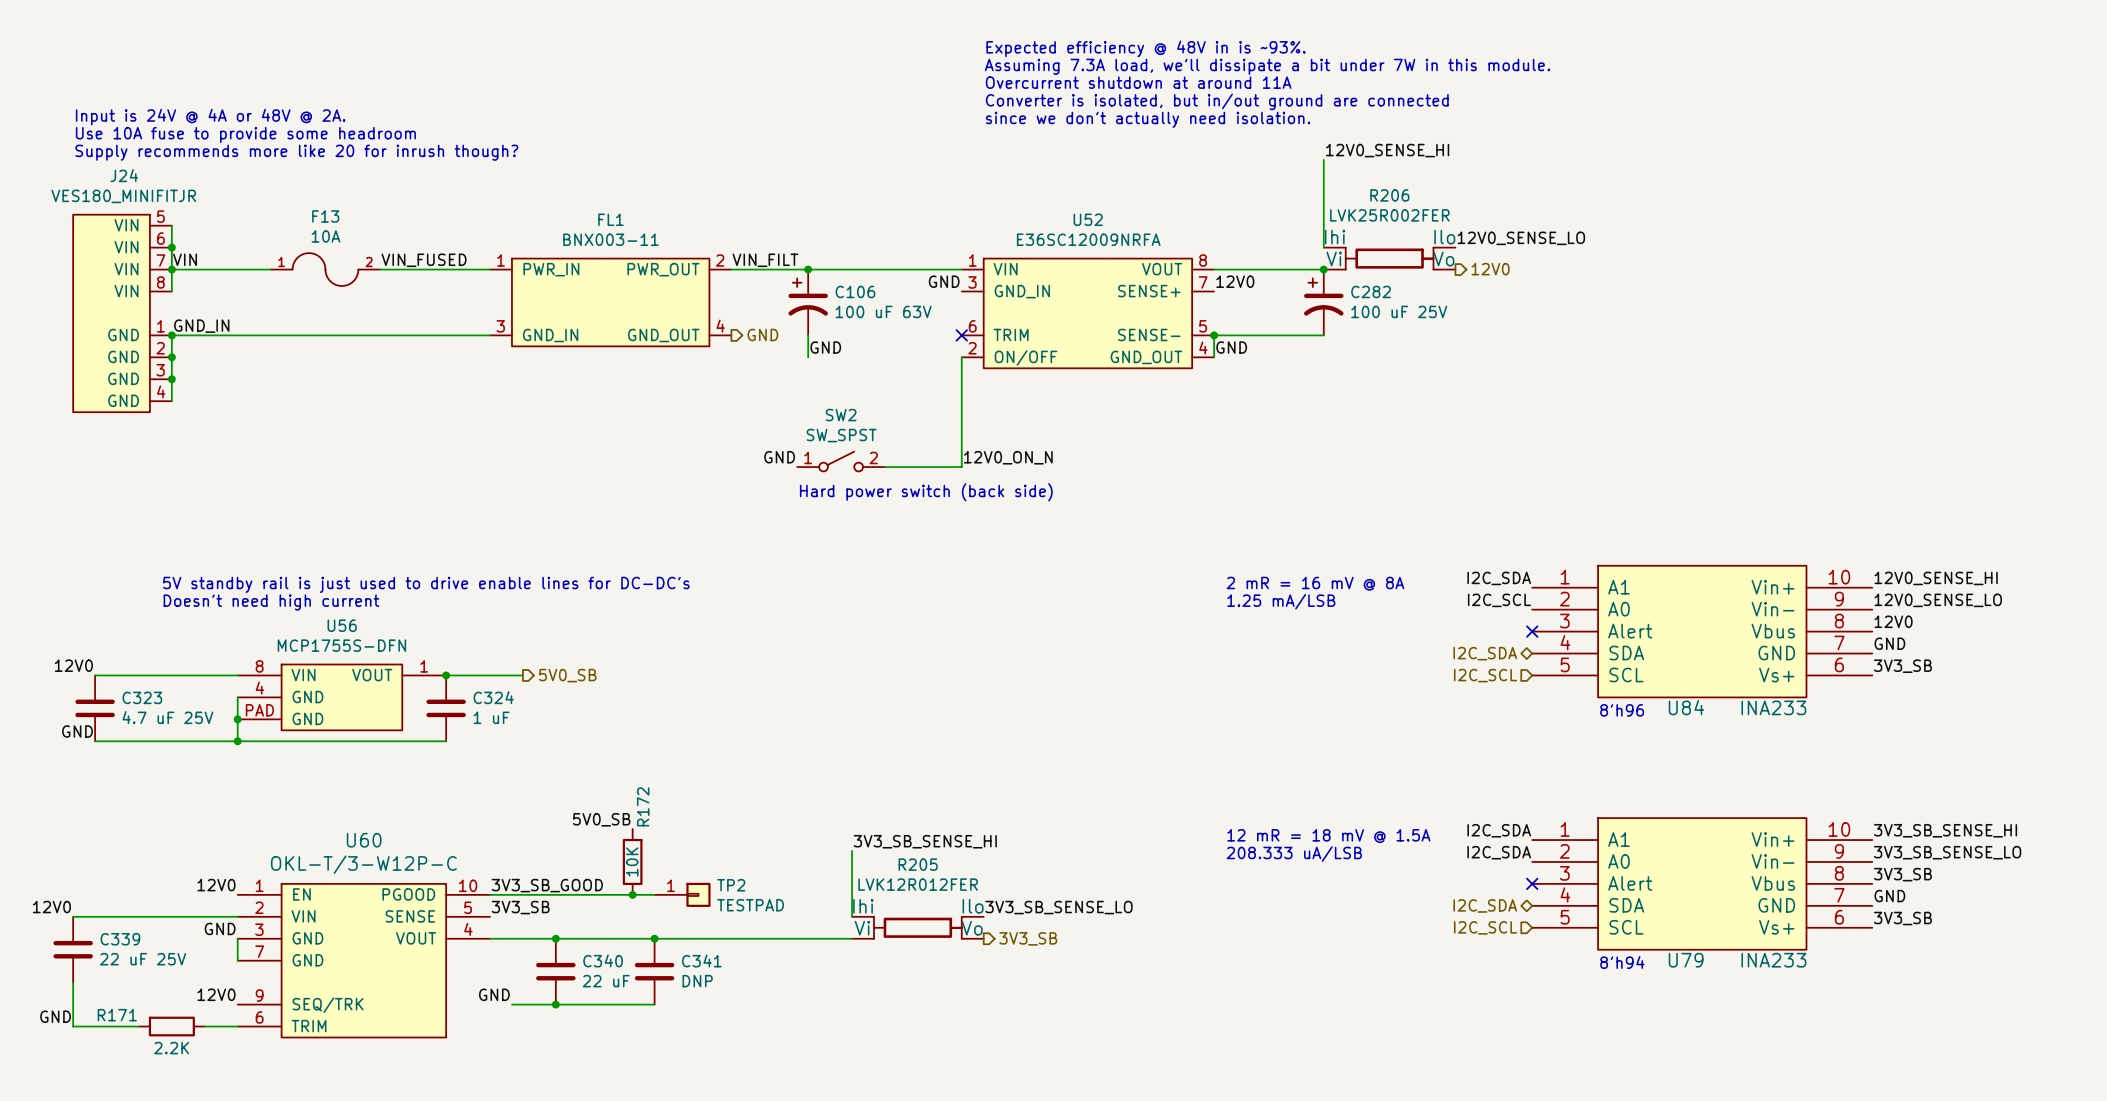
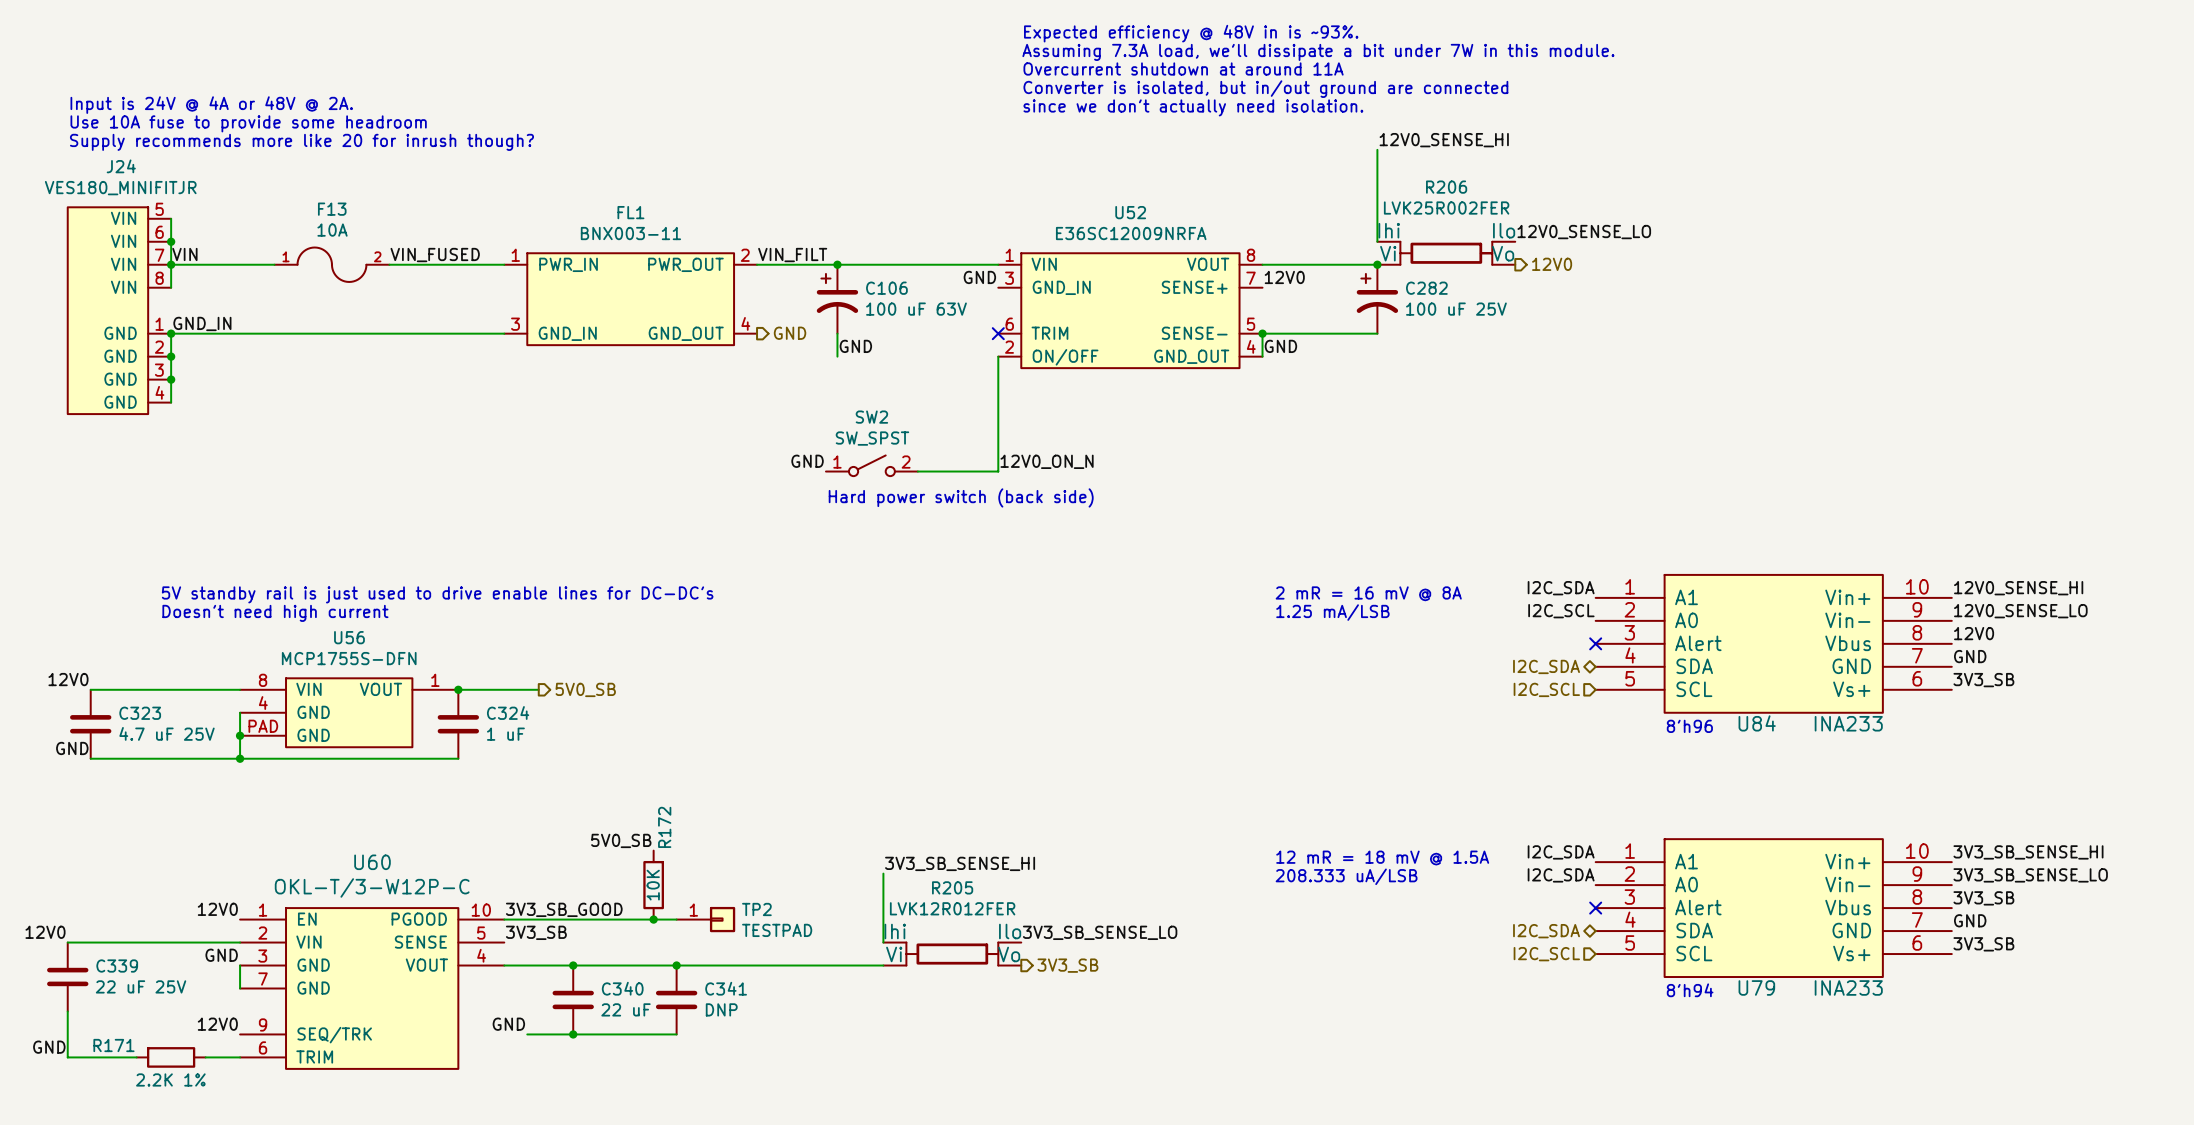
R171 value: 2.2K (171, 1048) -> 2.2K 1% (170, 1079)

